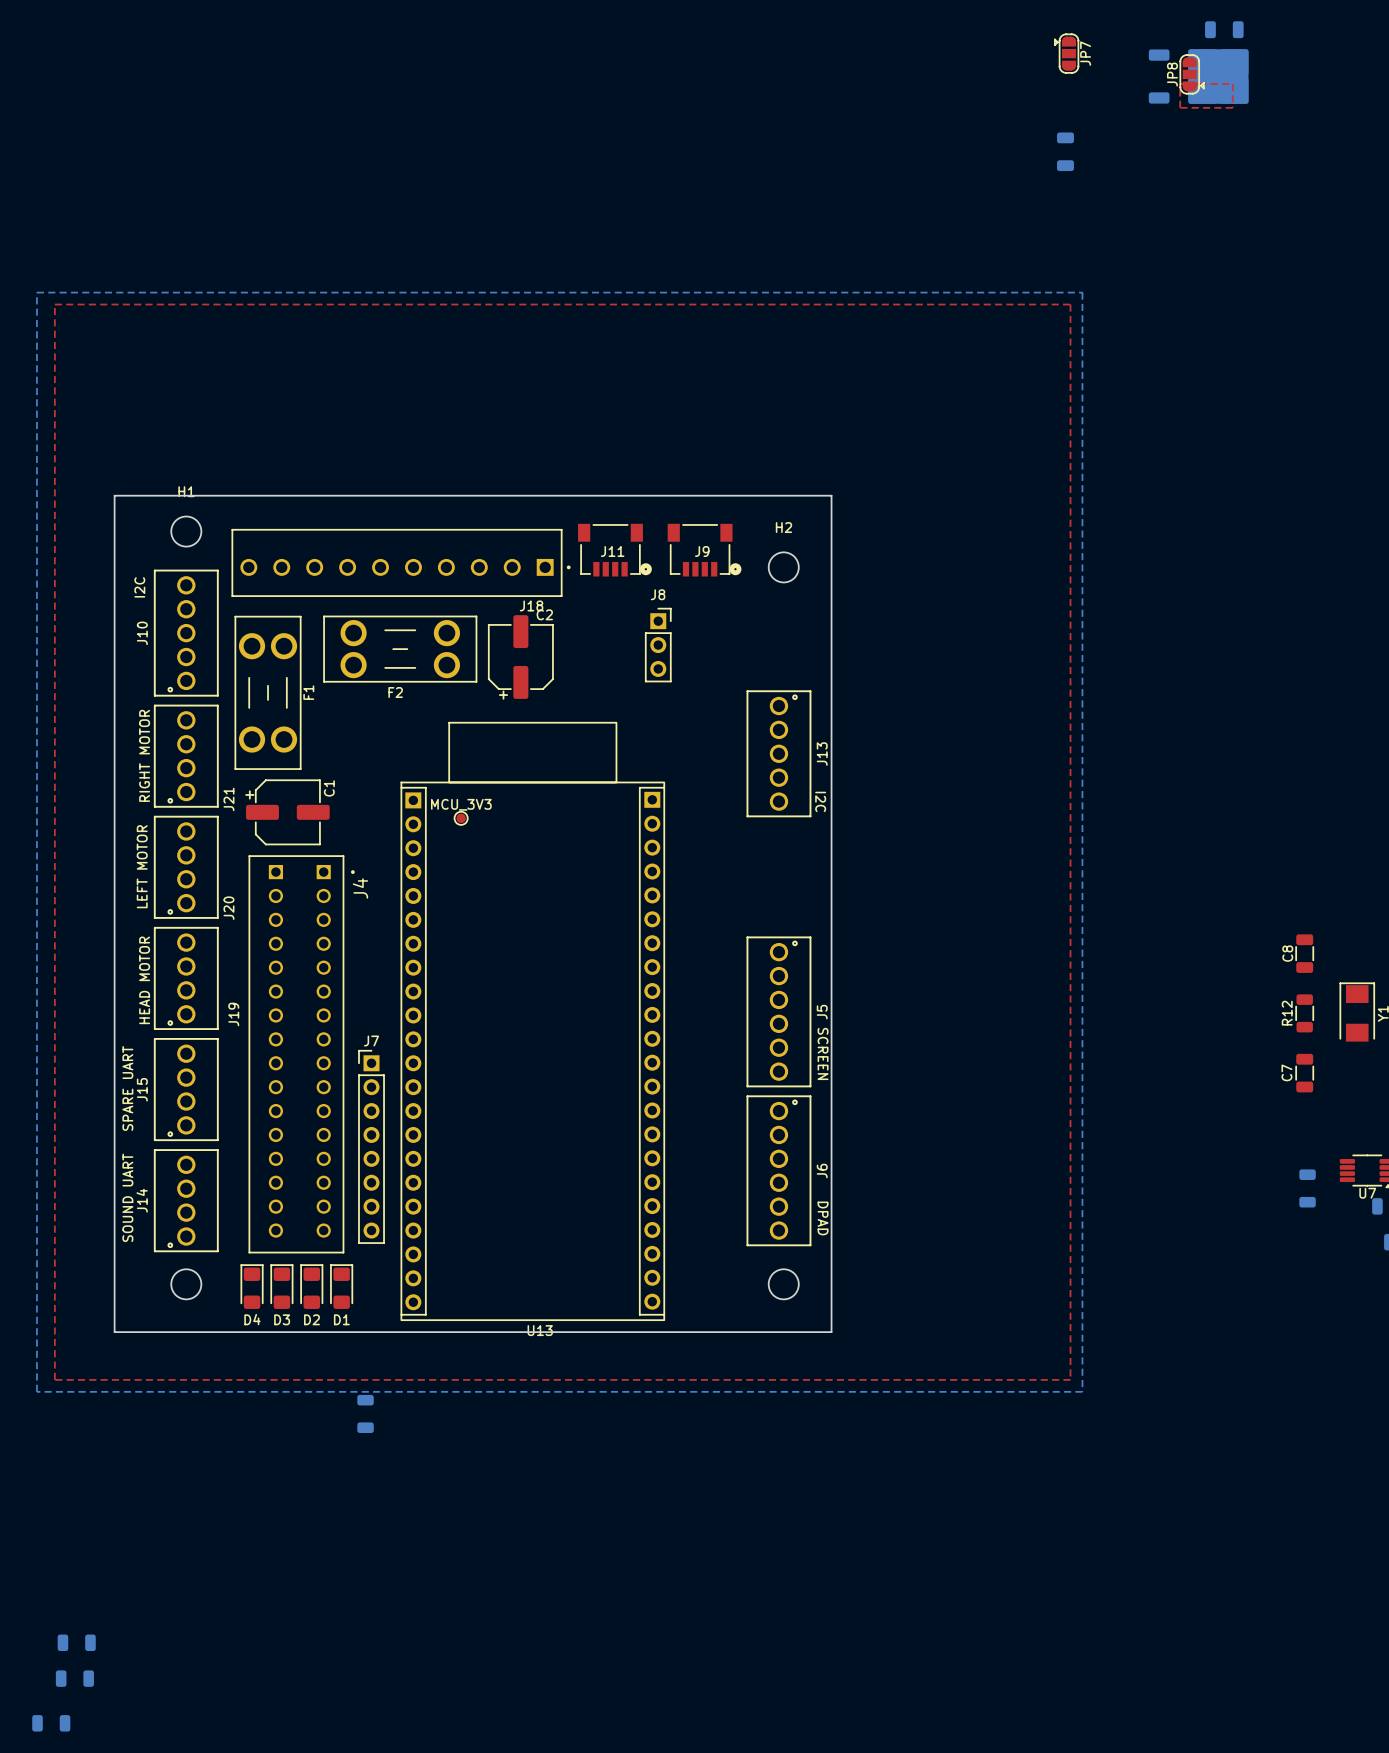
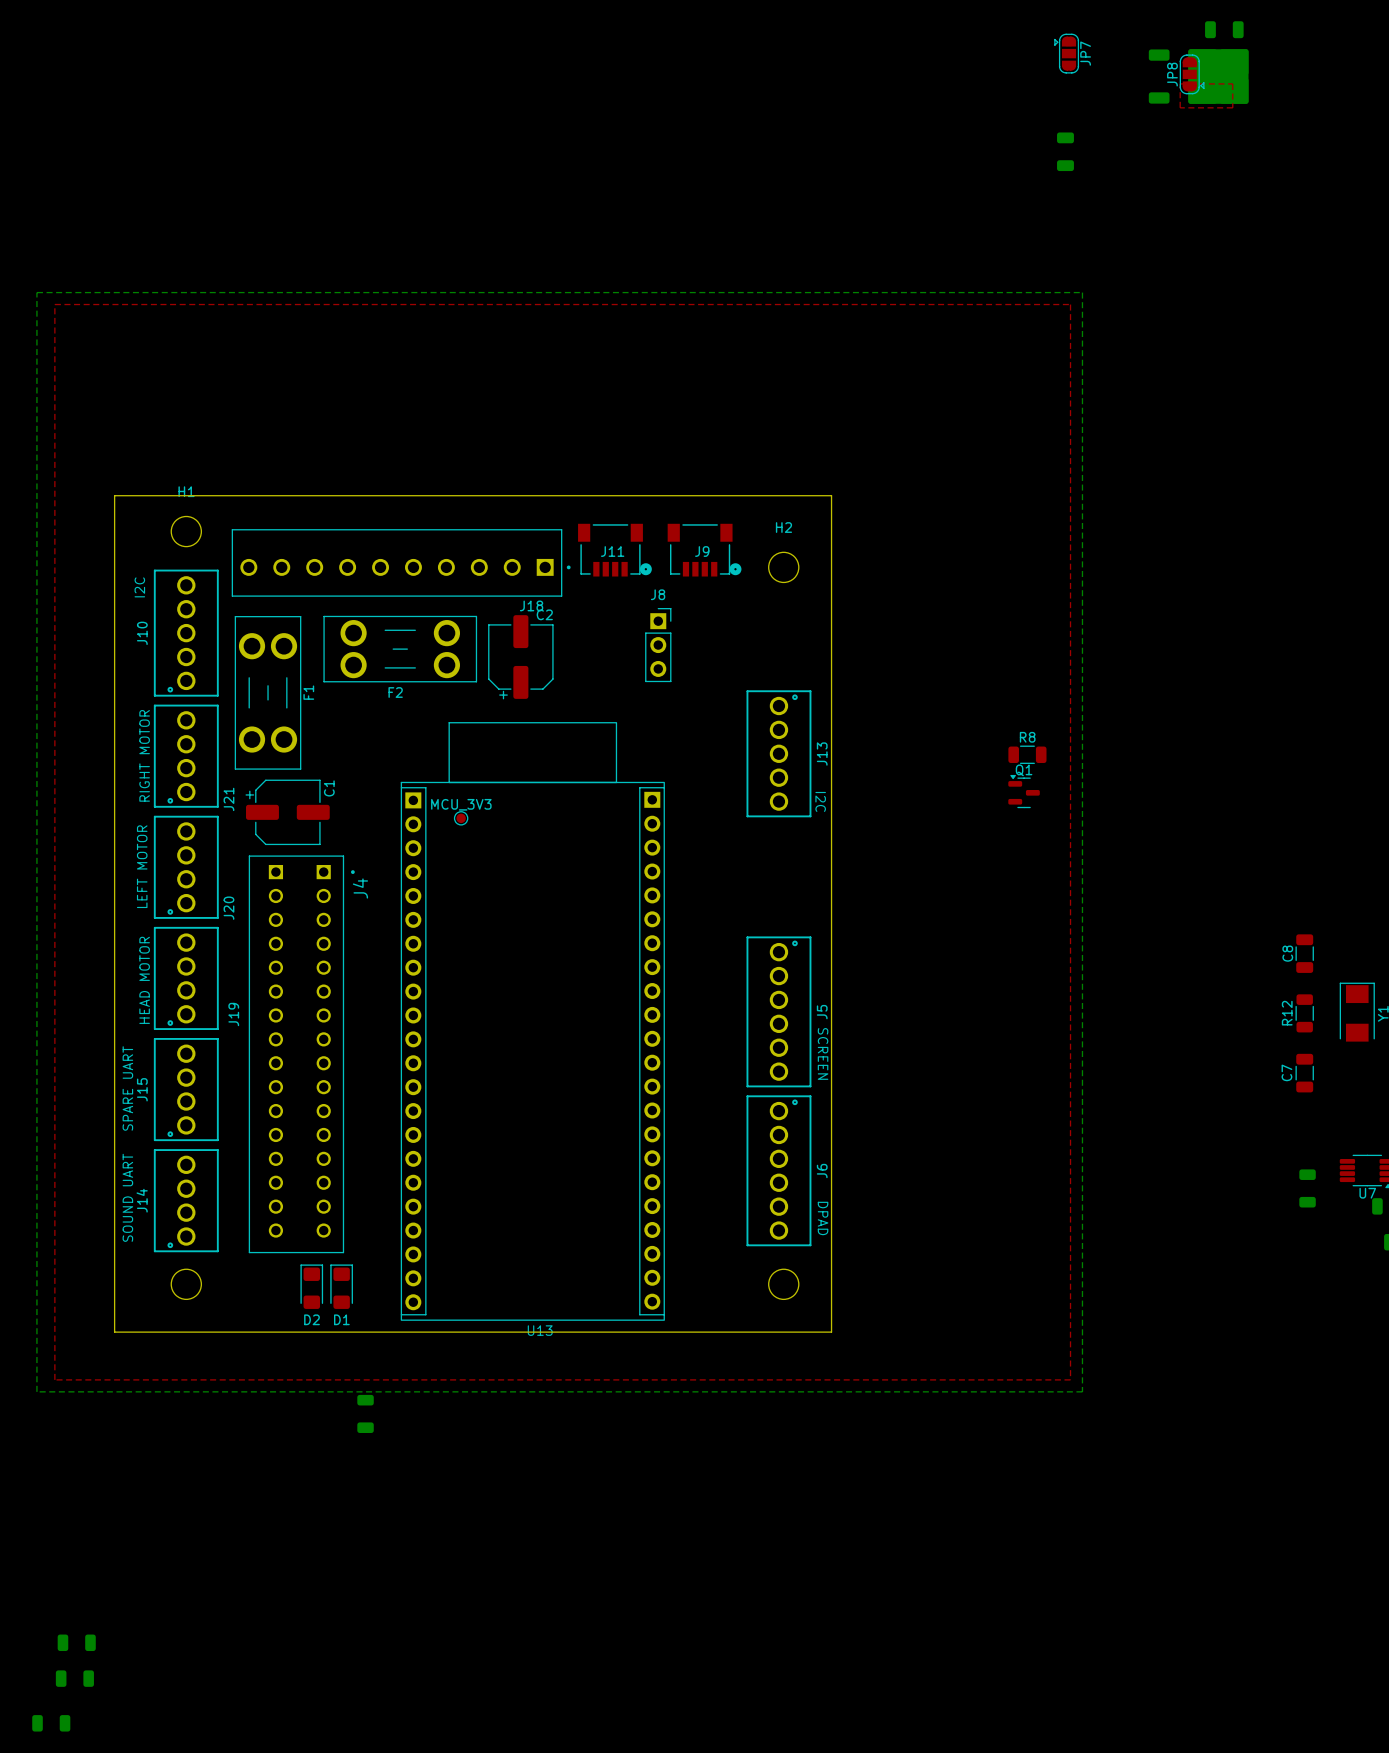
R8: none -> (1027, 754)
Q1: none -> (1024, 791)
J7: (371, 1146) -> none
D4: (252, 1286) -> none
D3: (281, 1286) -> none

